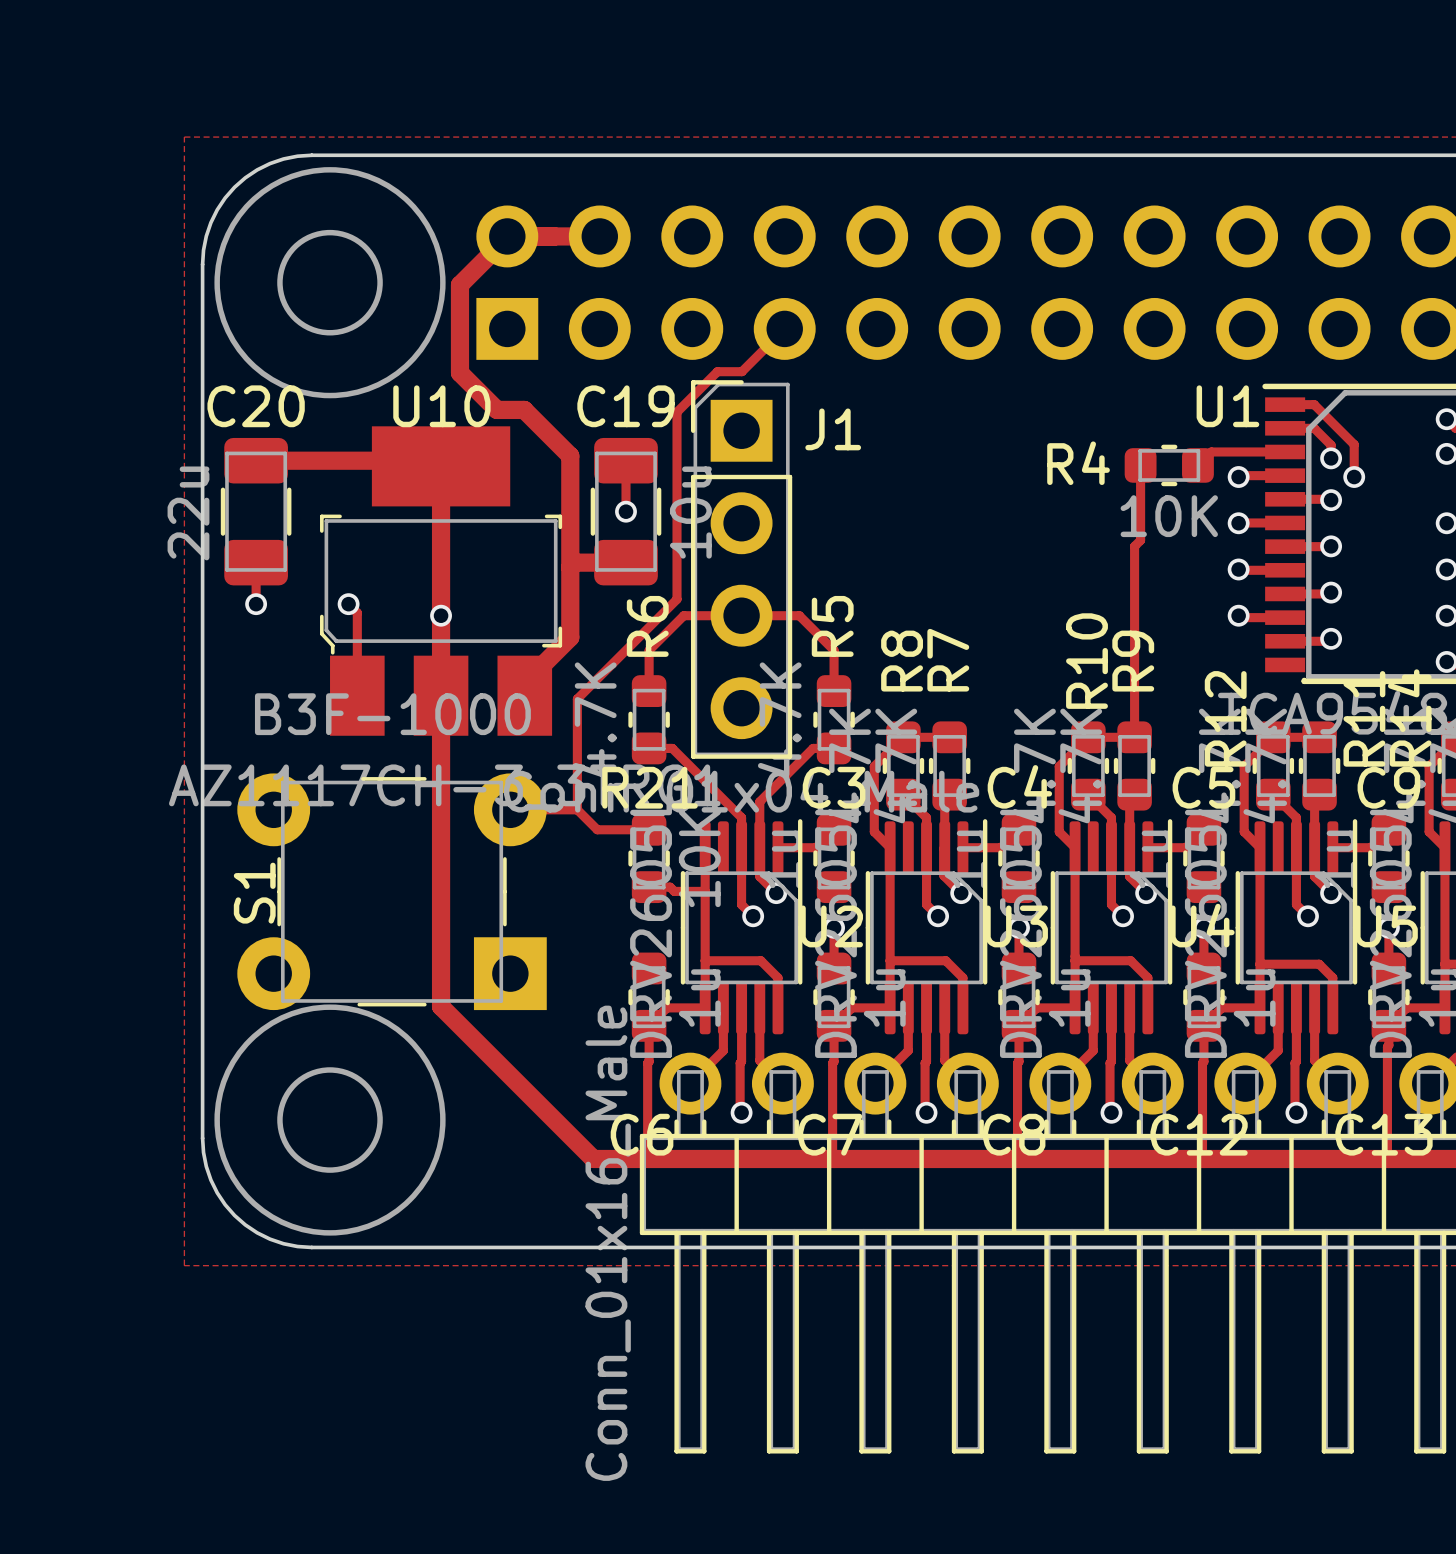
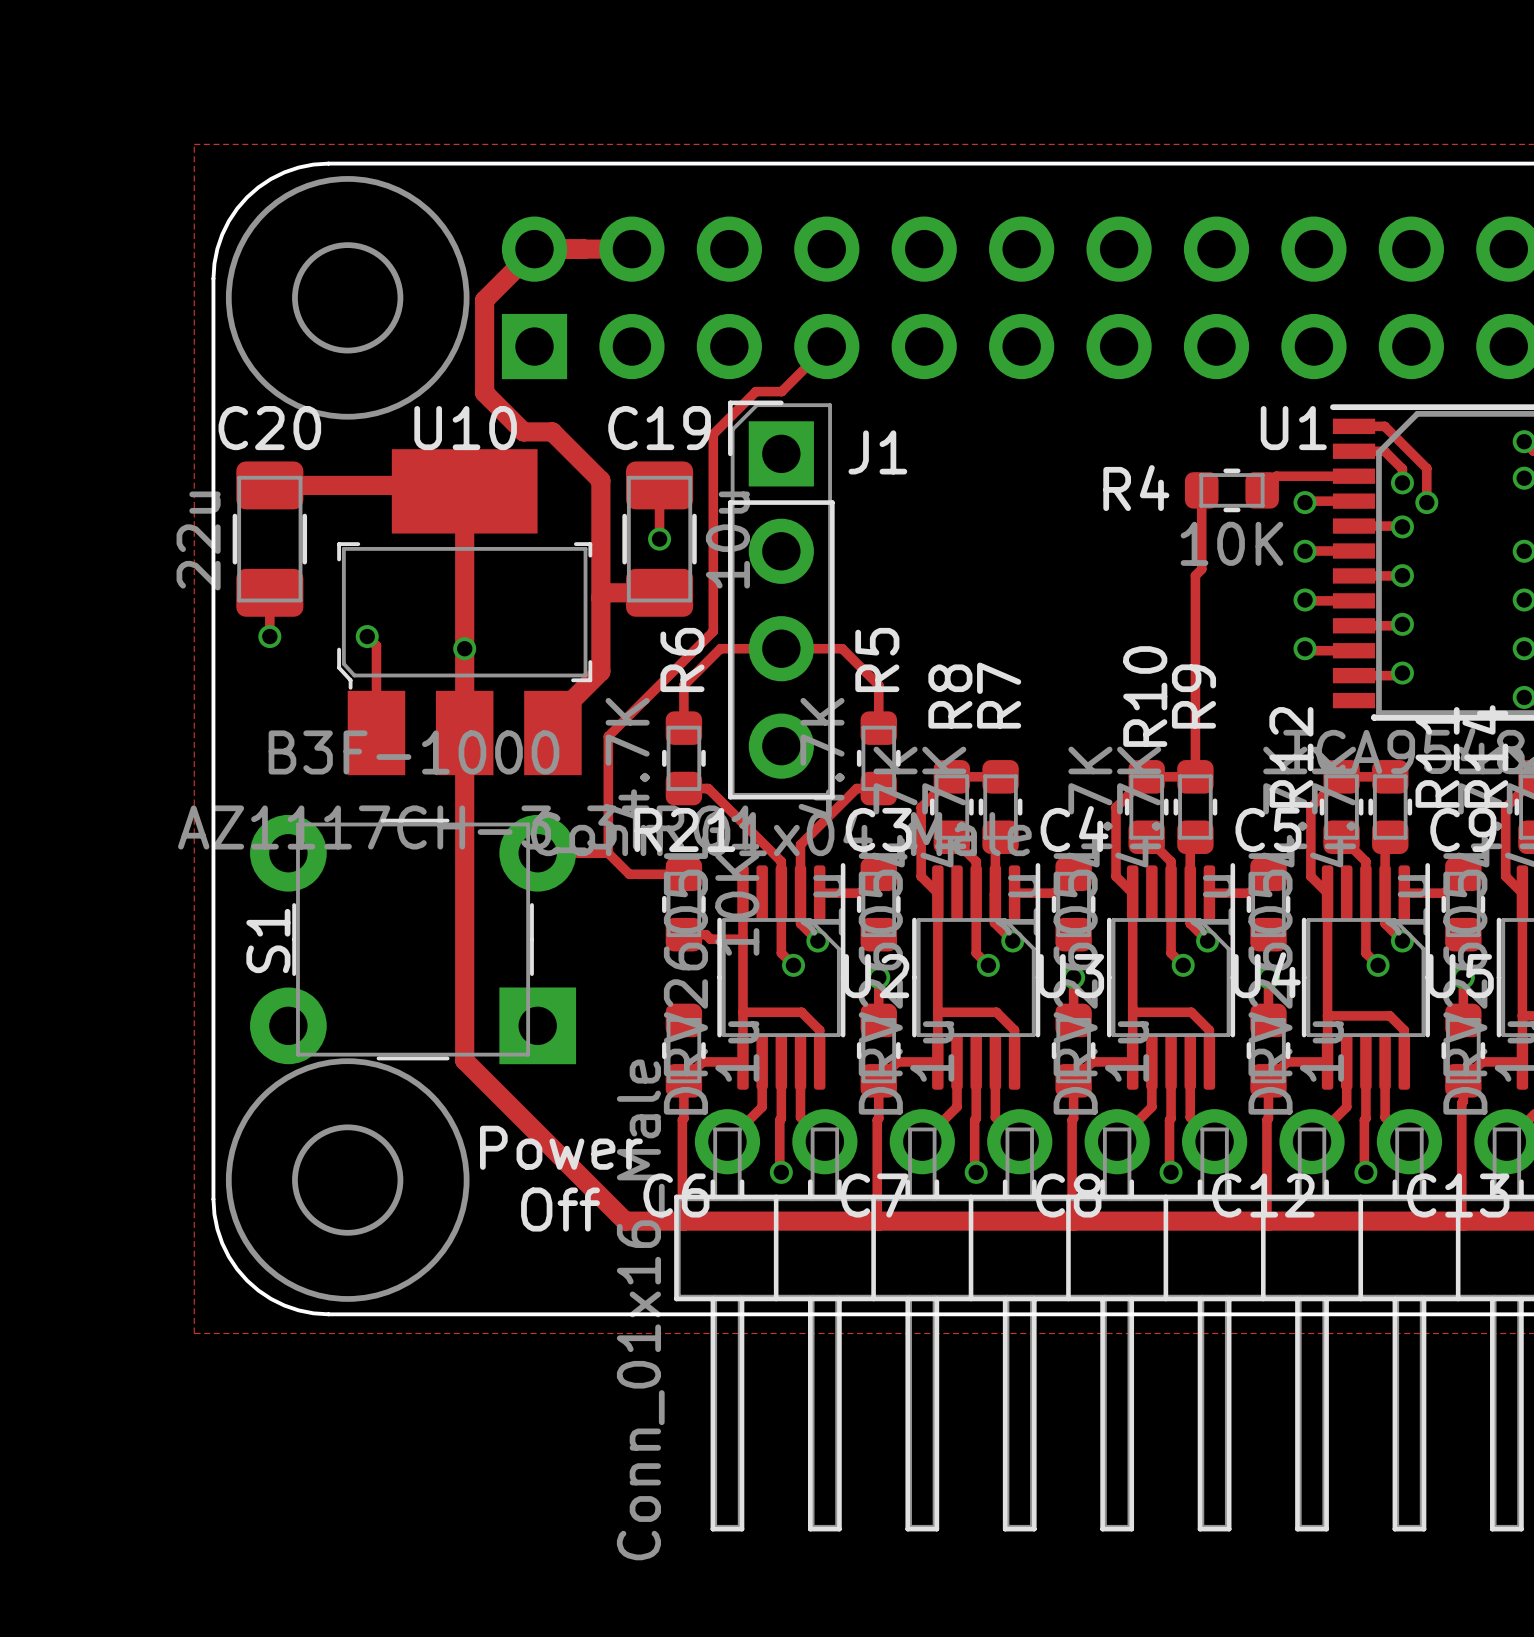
text: none -> Power (561, 1147)
text: none -> Off (560, 1209)

